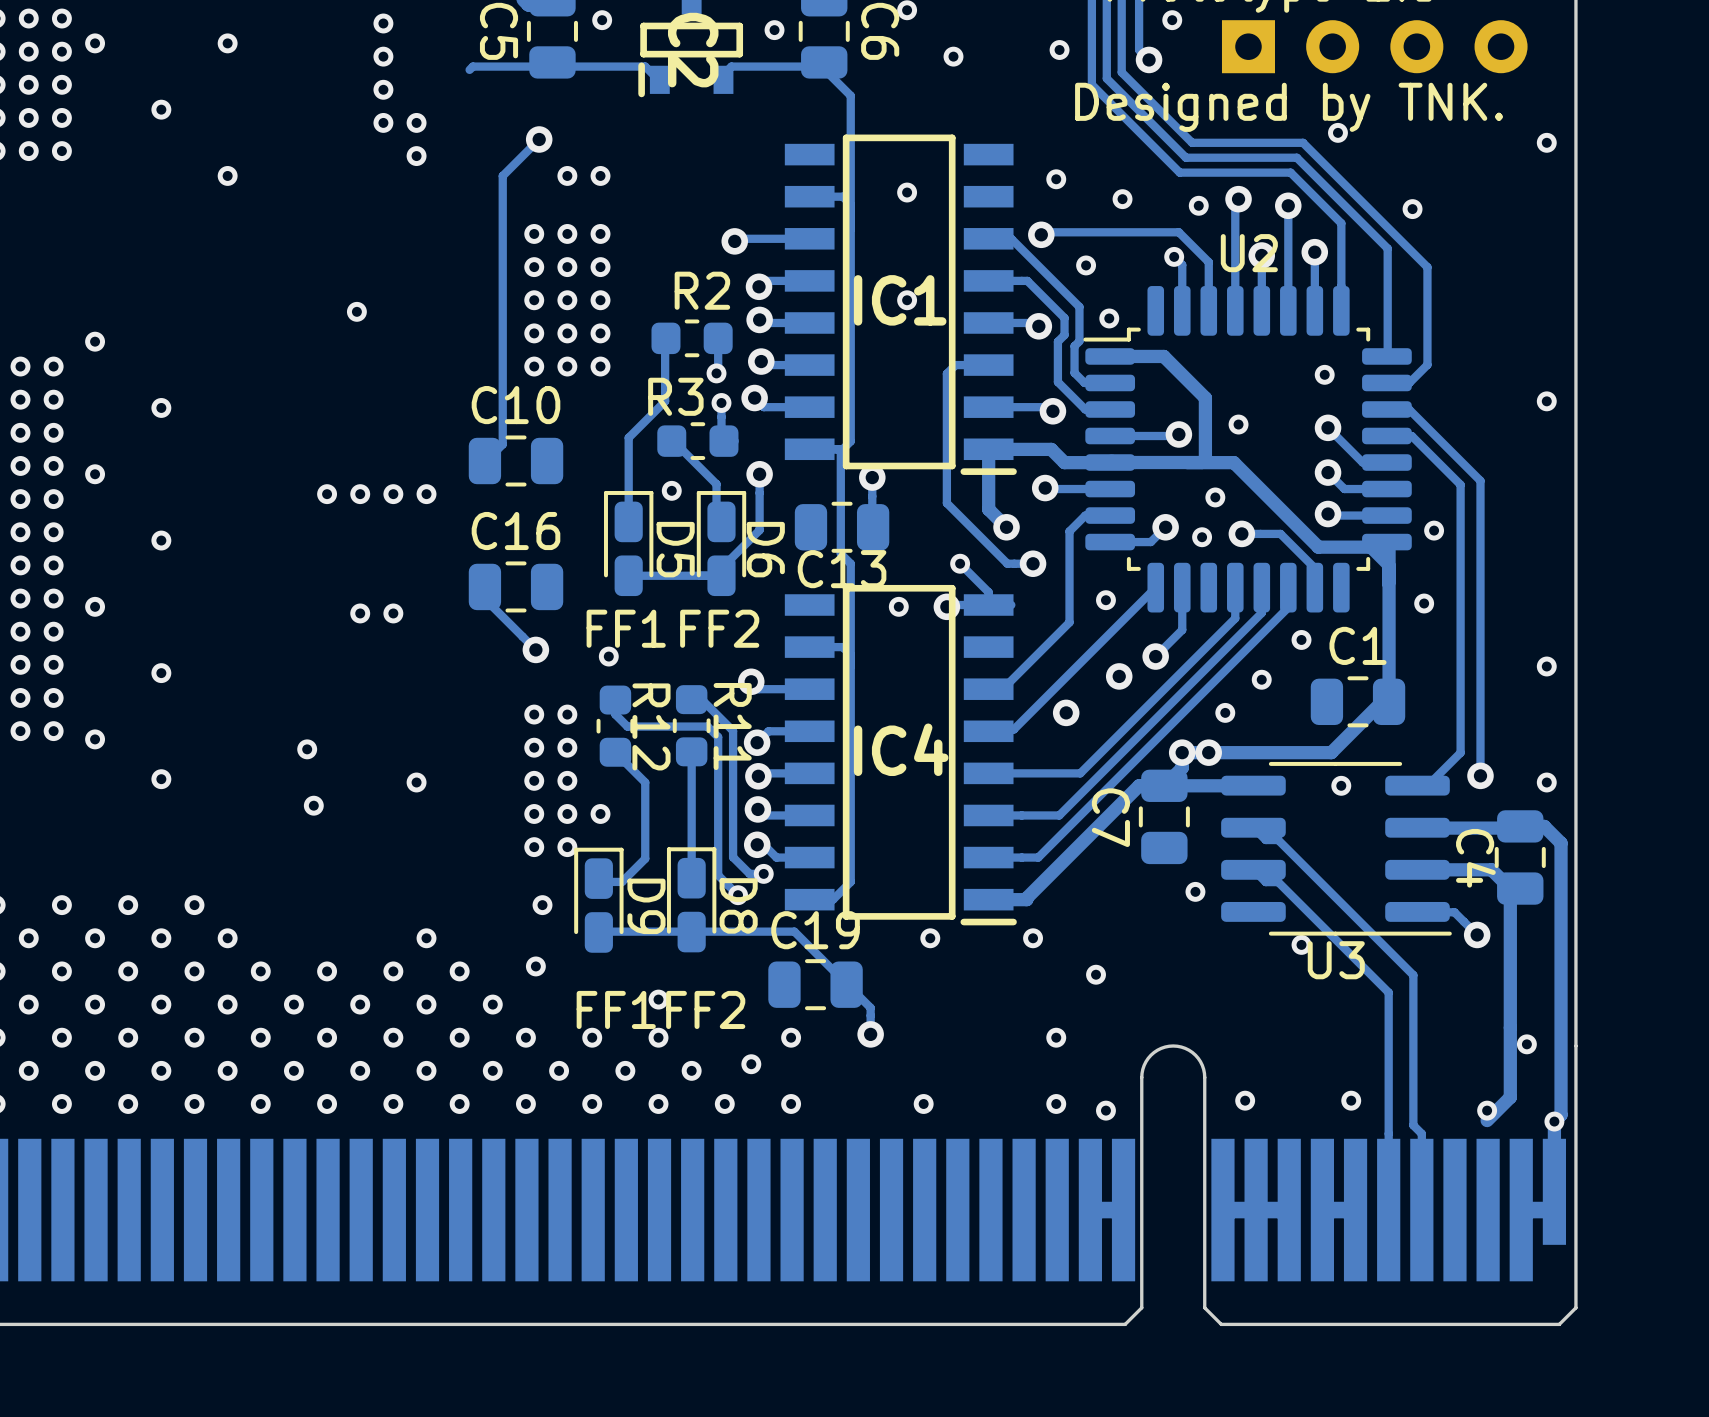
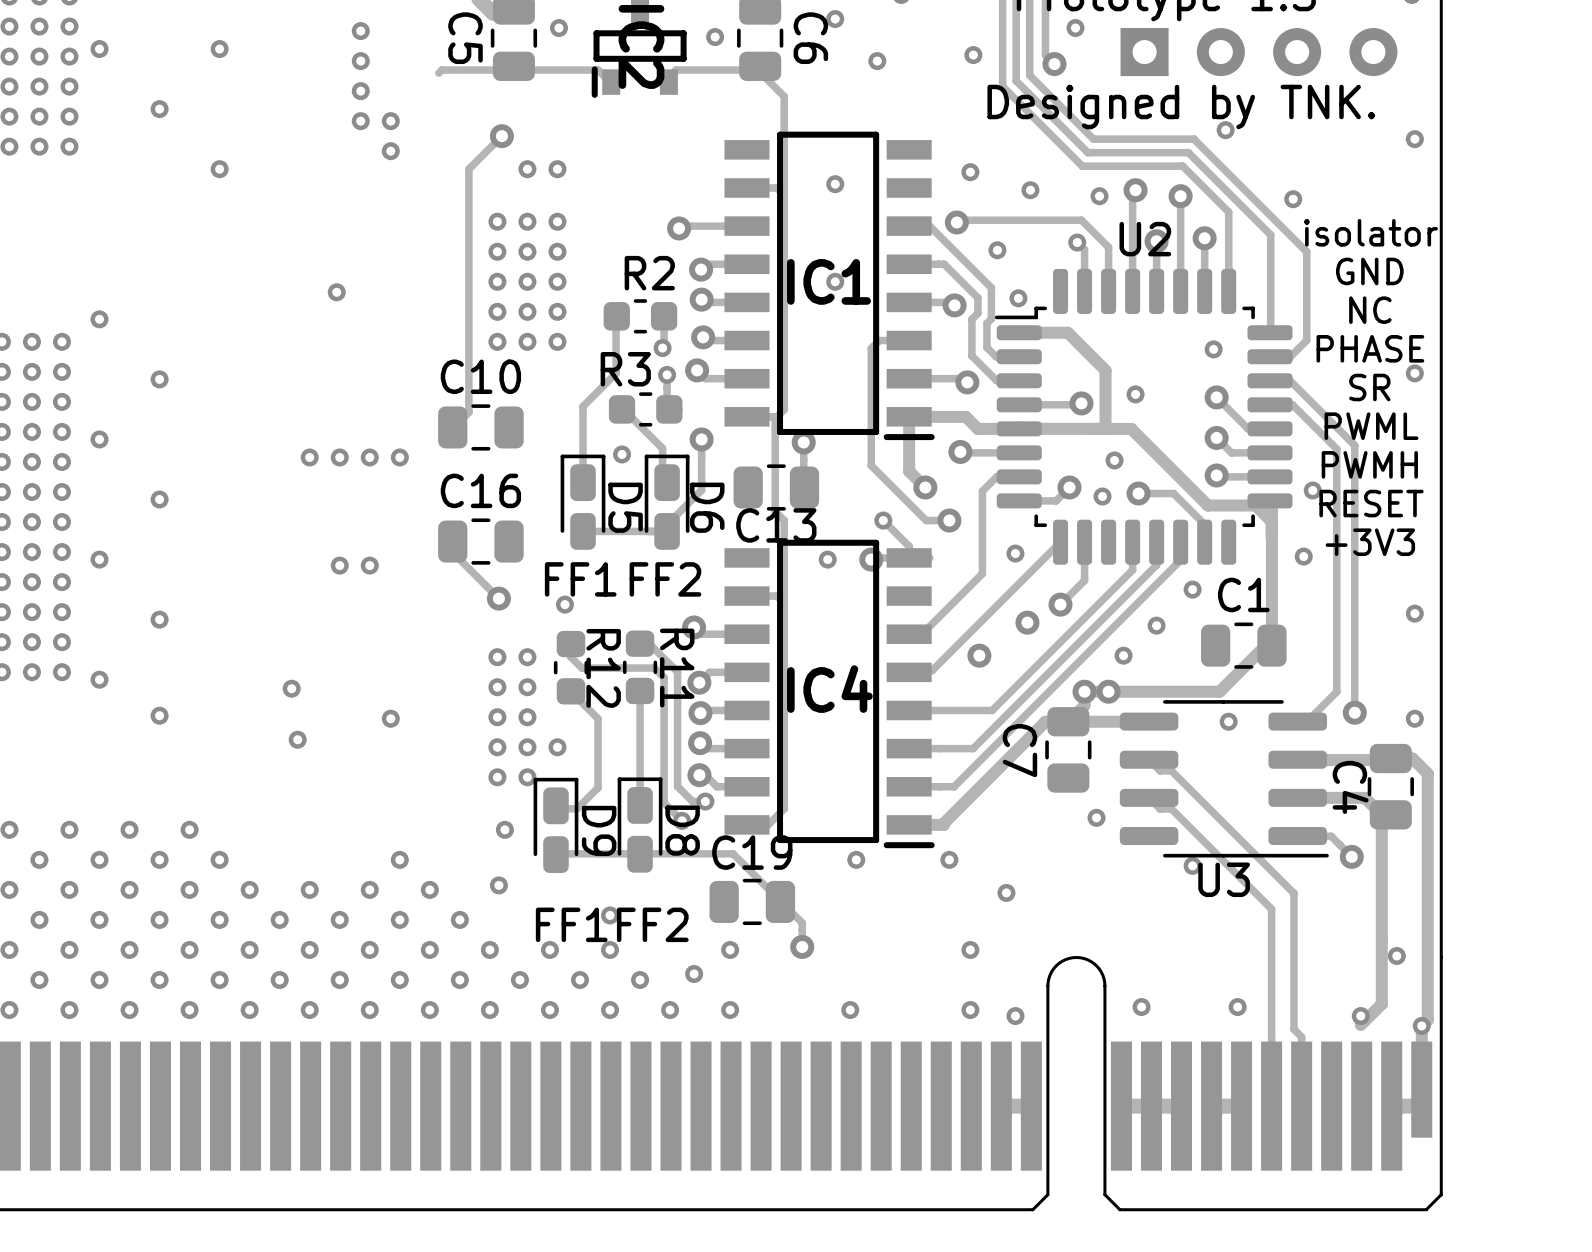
text: none -> isolator (1370, 232)
text: none -> GND (1369, 271)
text: none -> NC (1370, 310)
text: none -> PHASE (1370, 348)
text: none -> SR (1369, 387)
text: none -> PWML (1371, 426)
text: none -> PWMH (1369, 464)
text: none -> RESET (1371, 503)
text: none -> +3V3 (1370, 542)

